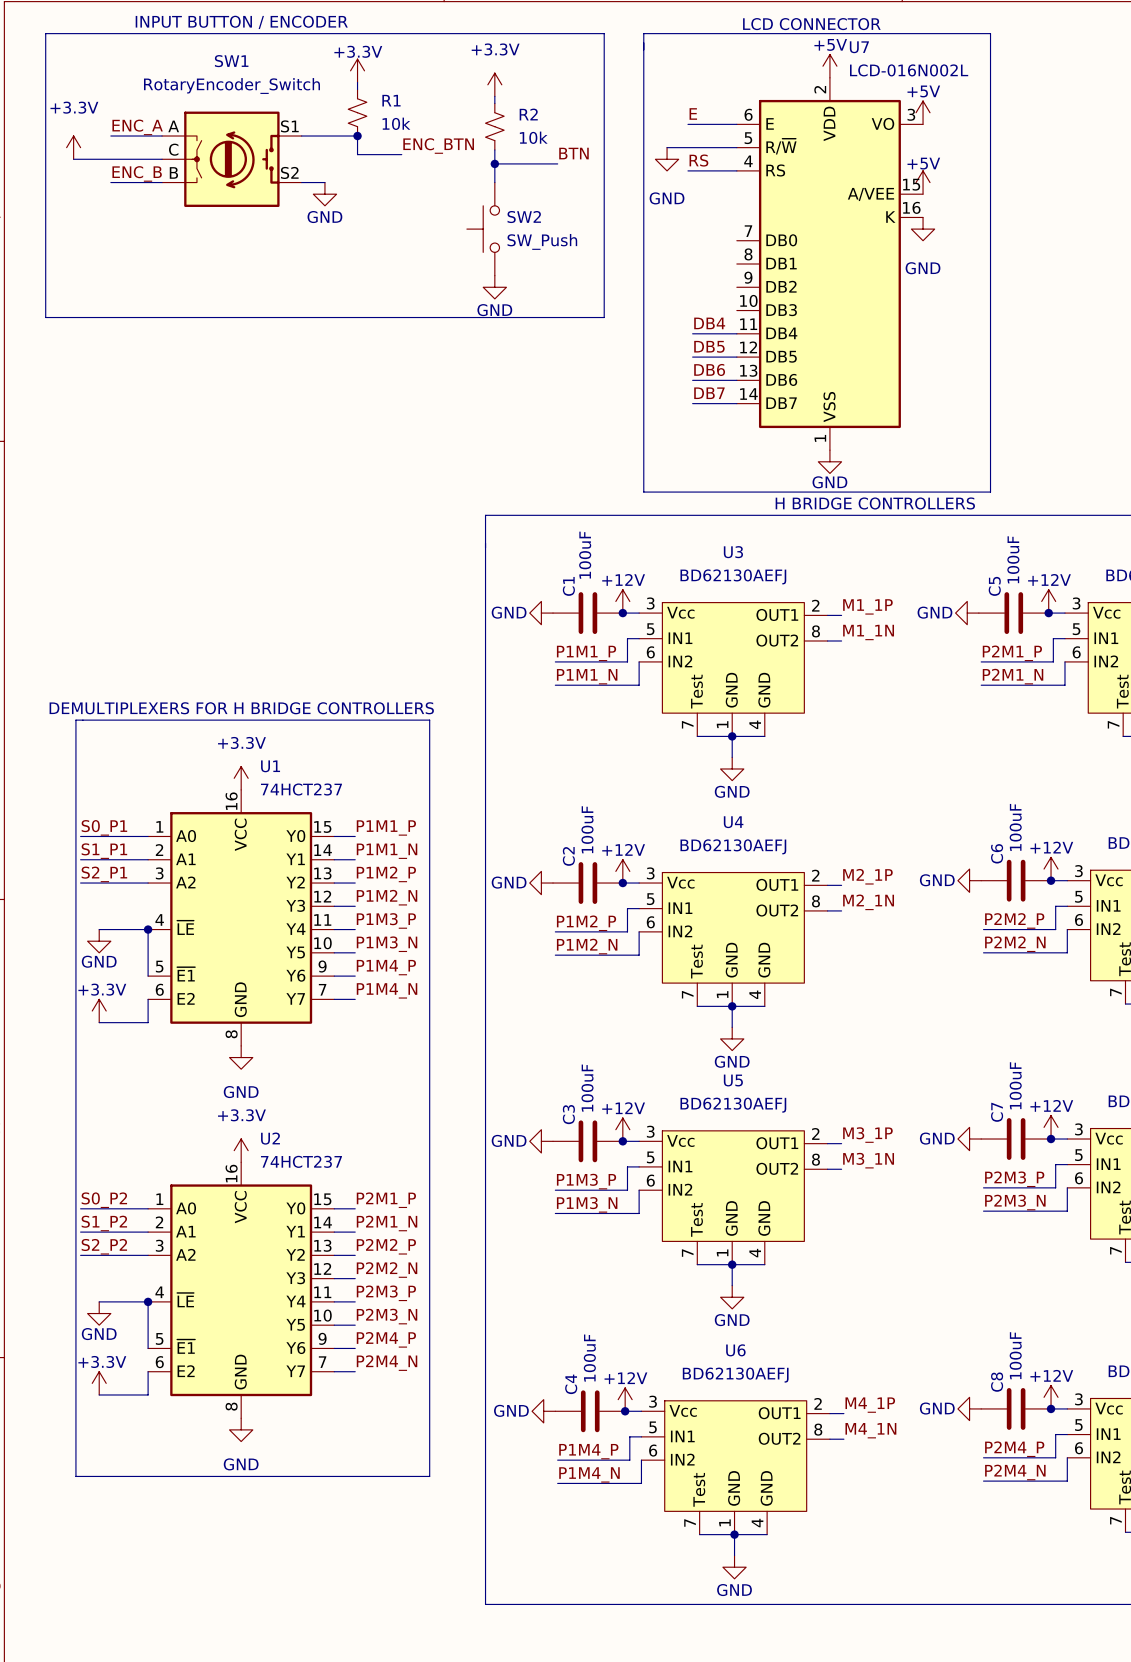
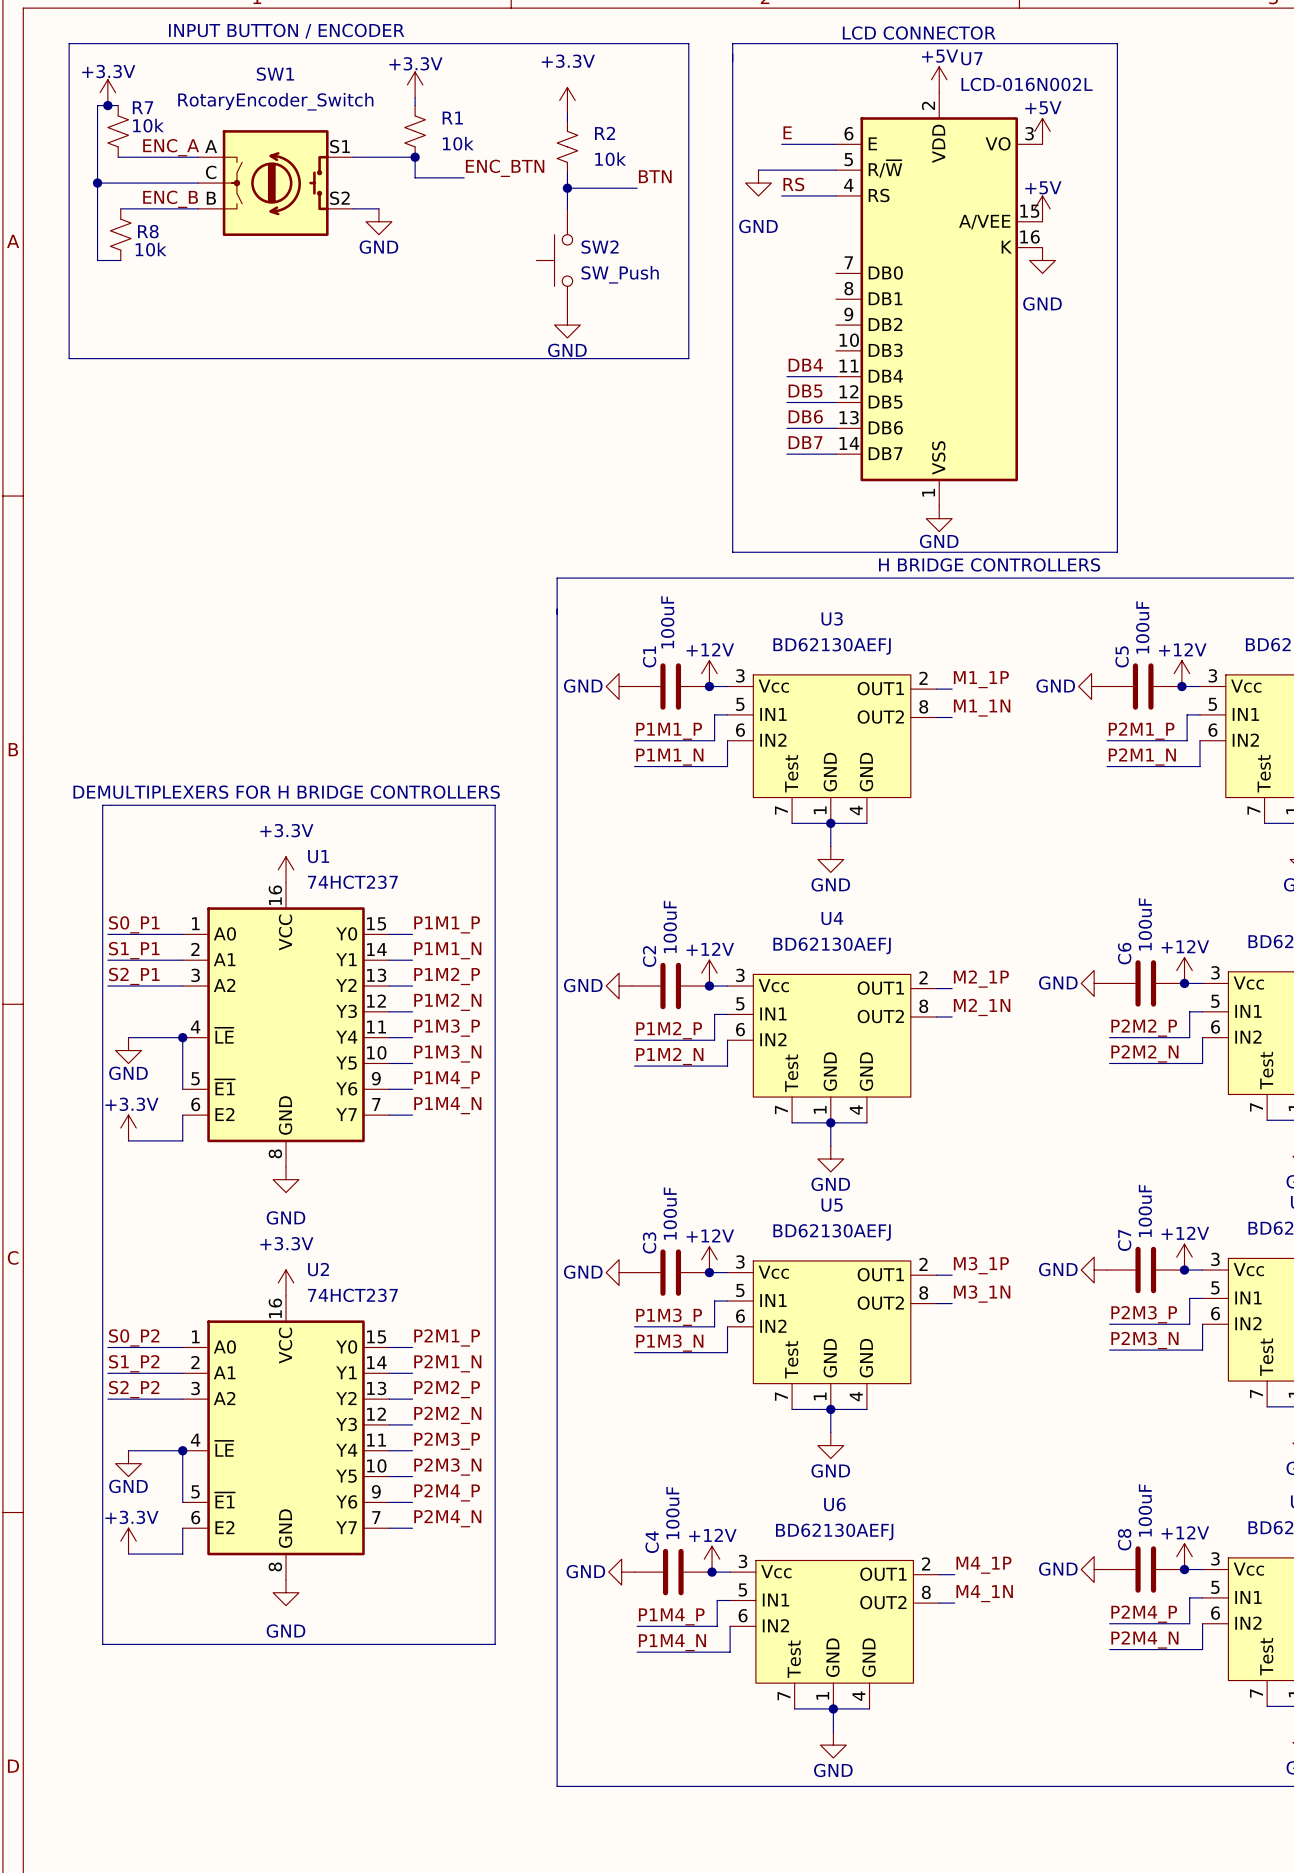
junction: none -> (107, 105)
wire: none -> (118, 105) (97, 105) (97, 260) (120, 260)
power symbol text position: +3.3V (74, 107) -> +3.3V (108, 71)
R7: none -> 10k (118, 131)
wire: none -> (118, 157) (141, 157)
power symbol position: +3.3V (73, 147) -> +3.3V (107, 92)
junction: none -> (97, 183)
wire: none -> (120, 208) (141, 208)
R8: none -> 10k (120, 234)

